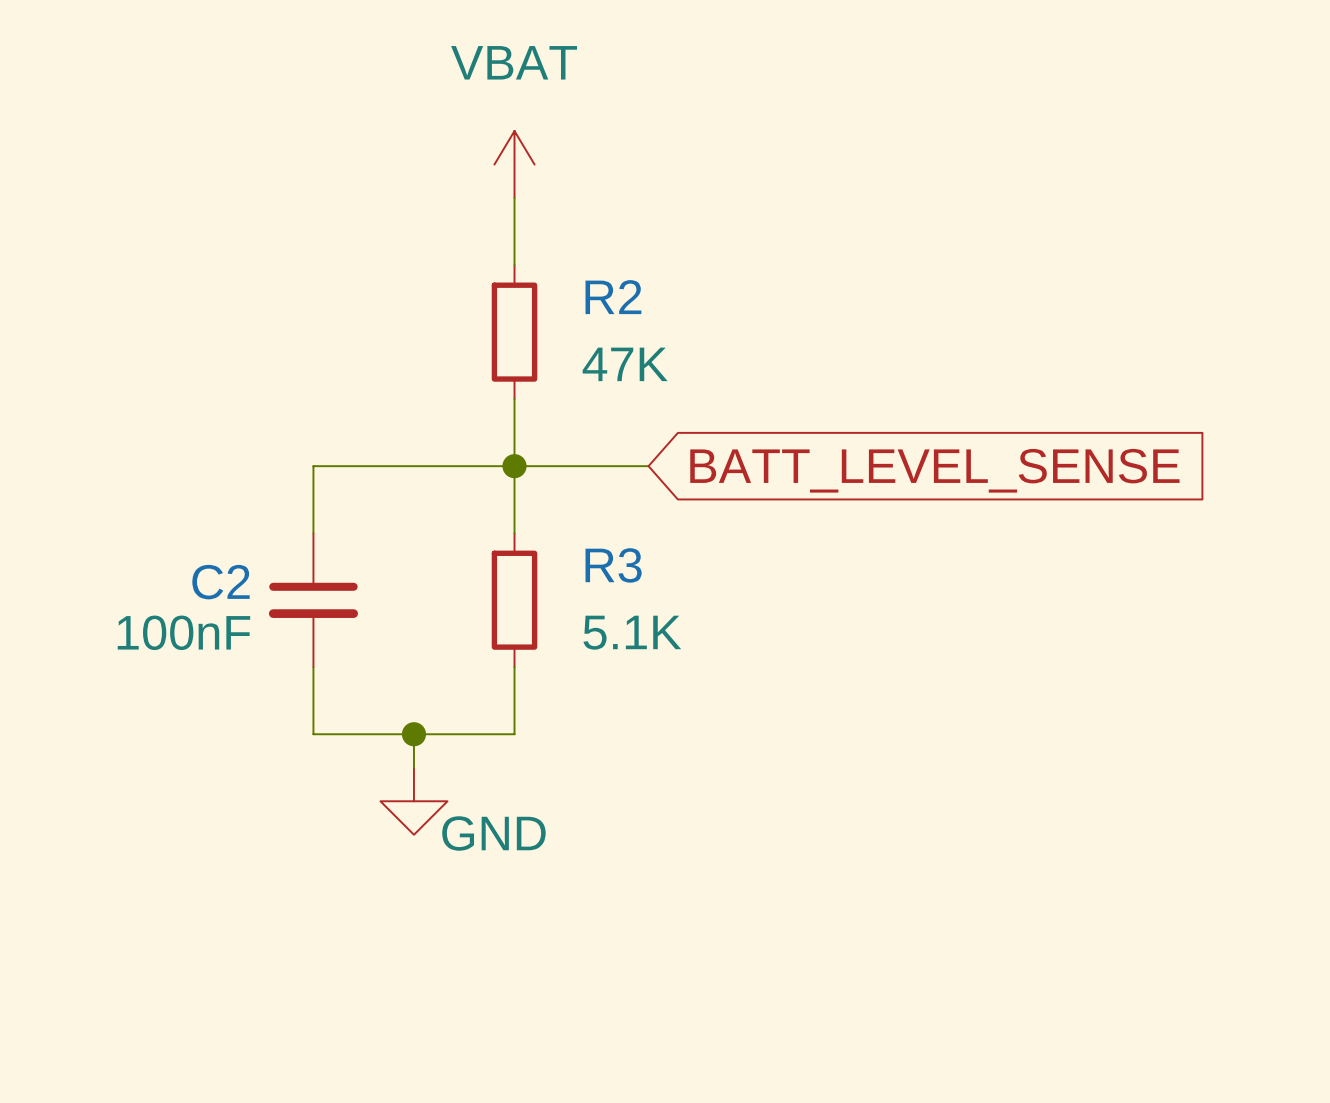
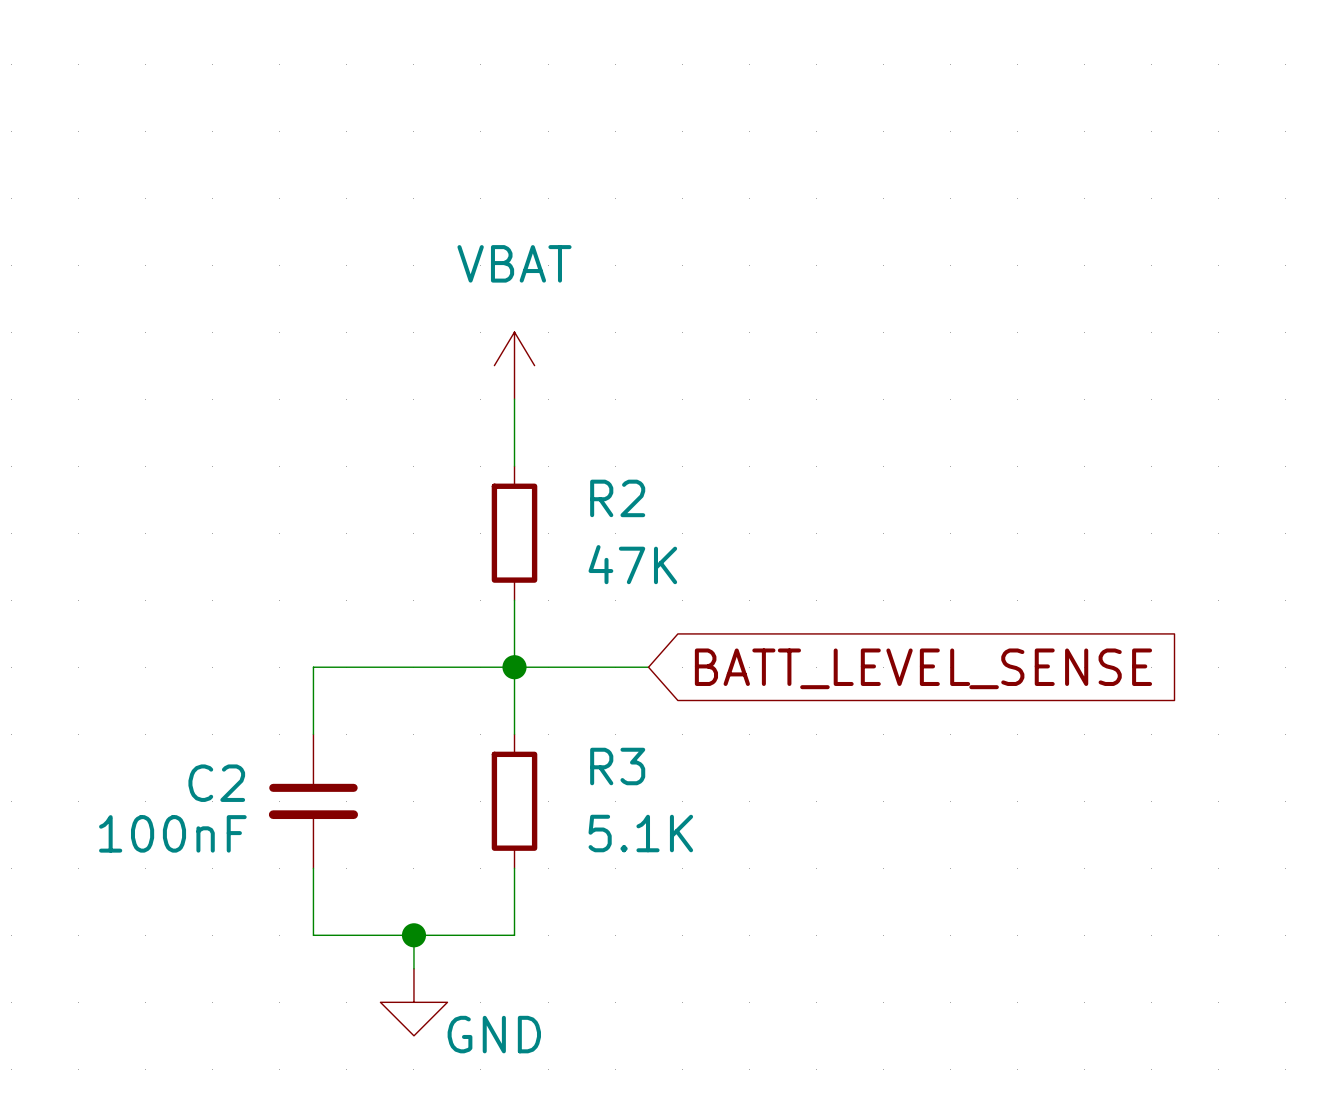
power symbol position: VBAT (514, 164) -> VBAT (514, 365)
wire: (514, 198) (514, 265) -> none
R2 position: (514, 332) -> (514, 533)
wire: (514, 466) (514, 533) -> (514, 600) (514, 667)
junction: (514, 466) -> none
wire: (648, 466) (313, 466) (313, 533) -> none
global label position: BATT_LEVEL_SENSE (934, 470) -> BATT_LEVEL_SENSE (923, 668)
C2 position: (313, 600) -> (313, 801)
R3 position: (514, 600) -> (514, 801)
wire: none -> (313, 667) (648, 667)
junction: none -> (514, 667)
wire: (313, 734) (514, 734) -> none
wire: (413, 734) (413, 767) -> (413, 935) (413, 968)
junction: (413, 734) -> none
power symbol position: GND (413, 801) -> GND (413, 1002)
wire: none -> (313, 868) (313, 935) (514, 935) (514, 868)
junction: none -> (413, 935)

